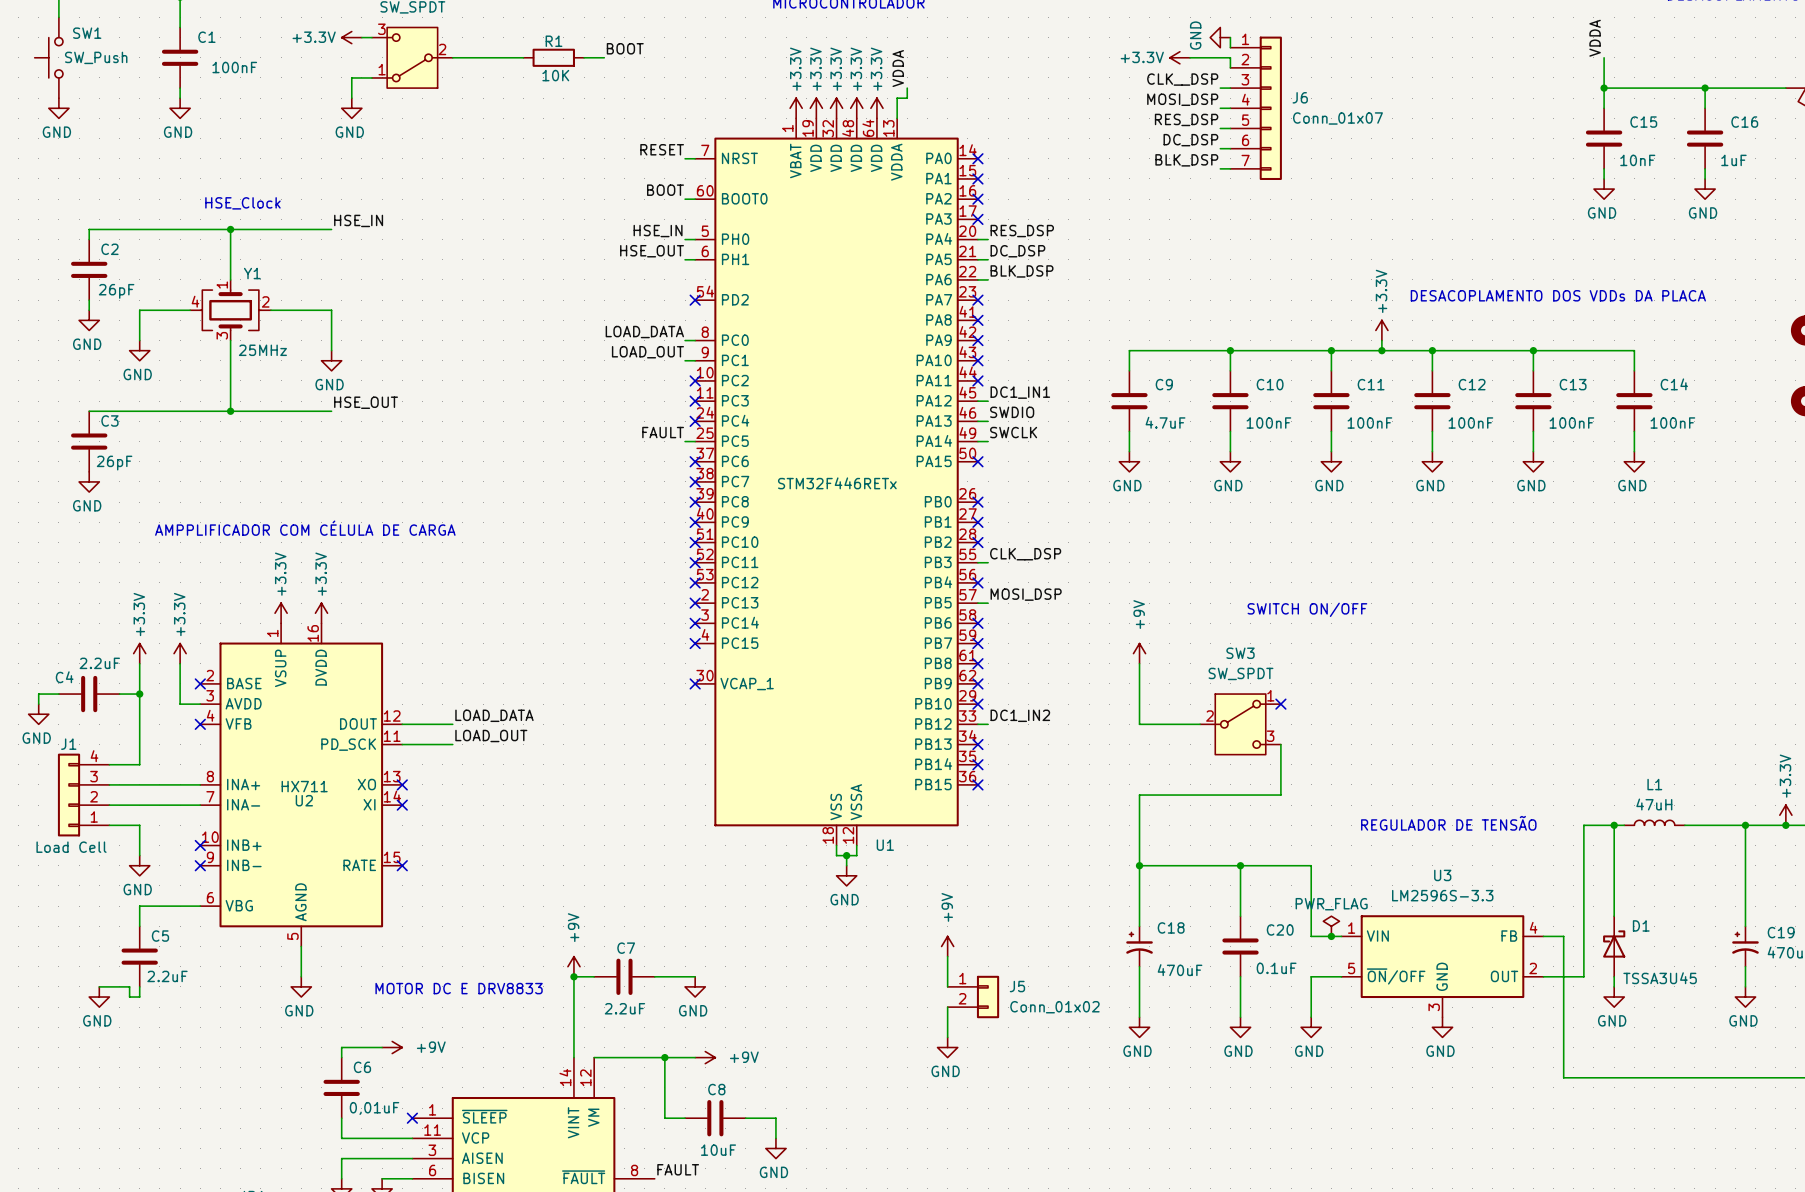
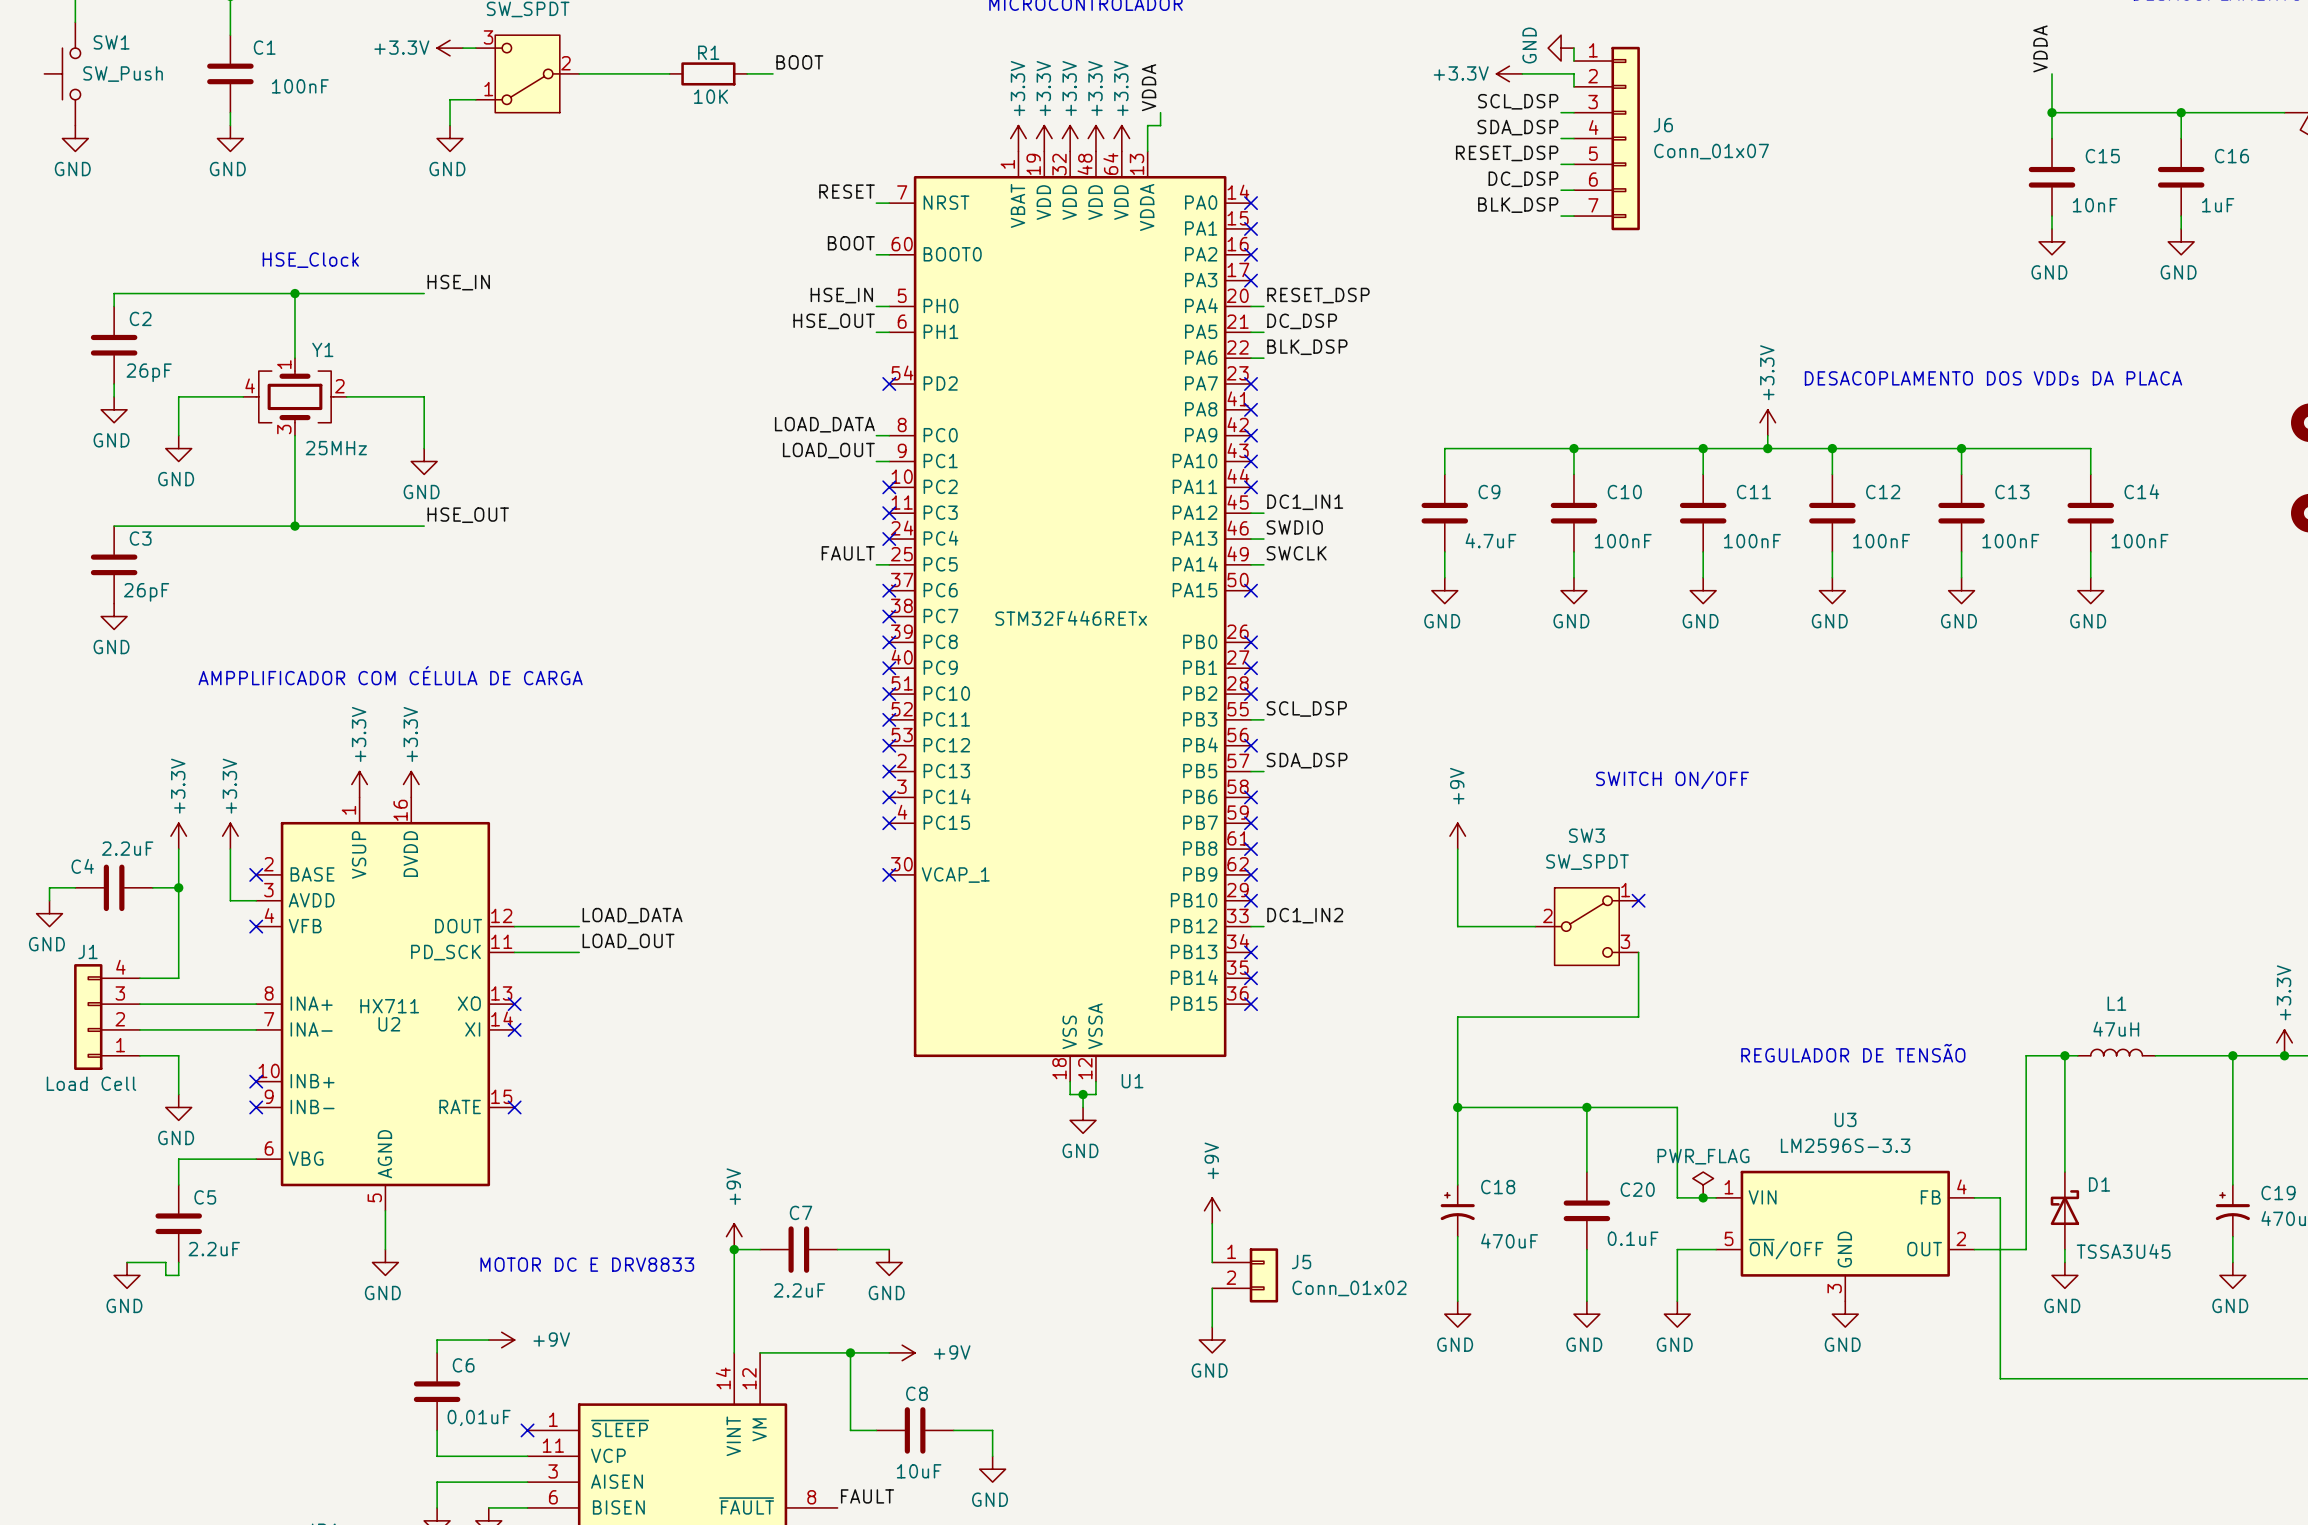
label: CLK__DSP (1182, 79) -> SCL_DSP (1518, 101)
label: MOSI_DSP (1182, 99) -> SDA_DSP (1517, 127)
label: RES_DSP (1186, 119) -> RESET_DSP (1507, 153)
label: RES_DSP (1022, 231) -> RESET_DSP (1318, 295)
label: CLK__DSP (1025, 554) -> SCL_DSP (1306, 708)
label: MOSI_DSP (1026, 594) -> SDA_DSP (1307, 760)

